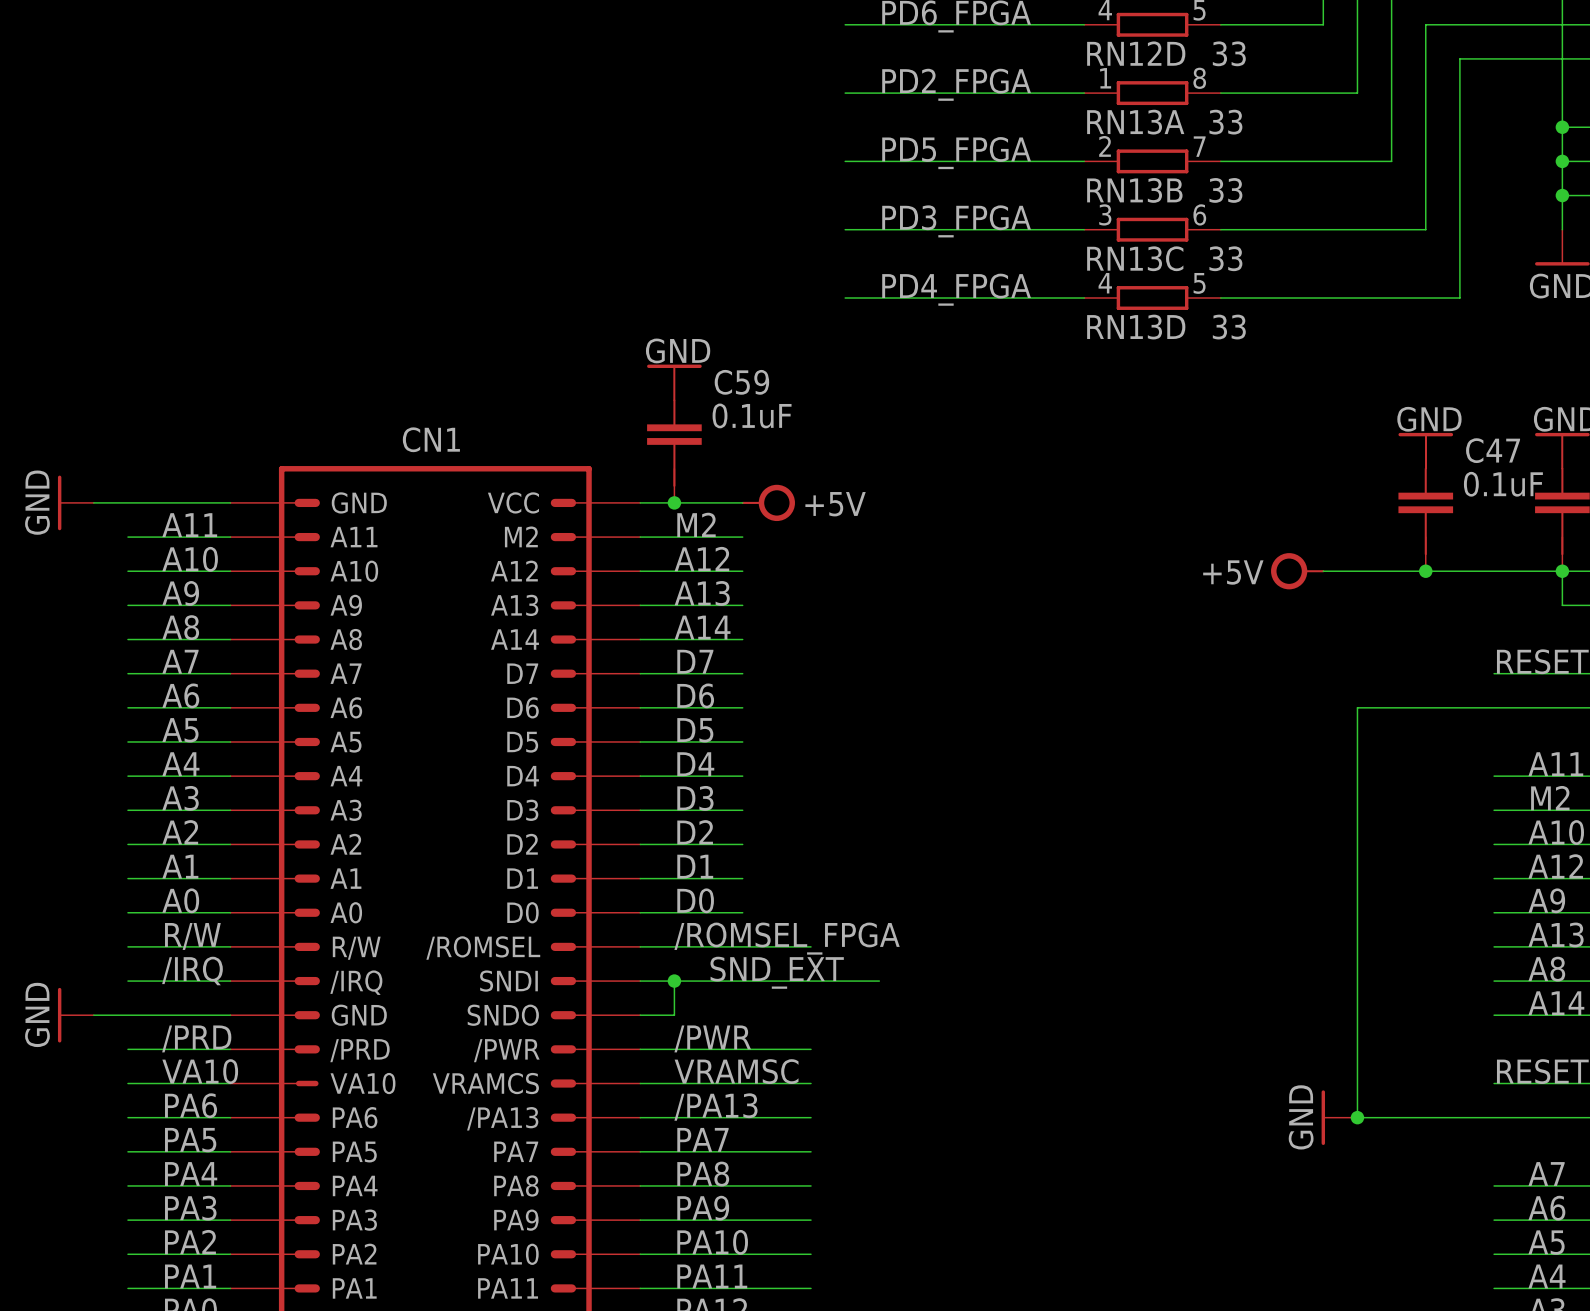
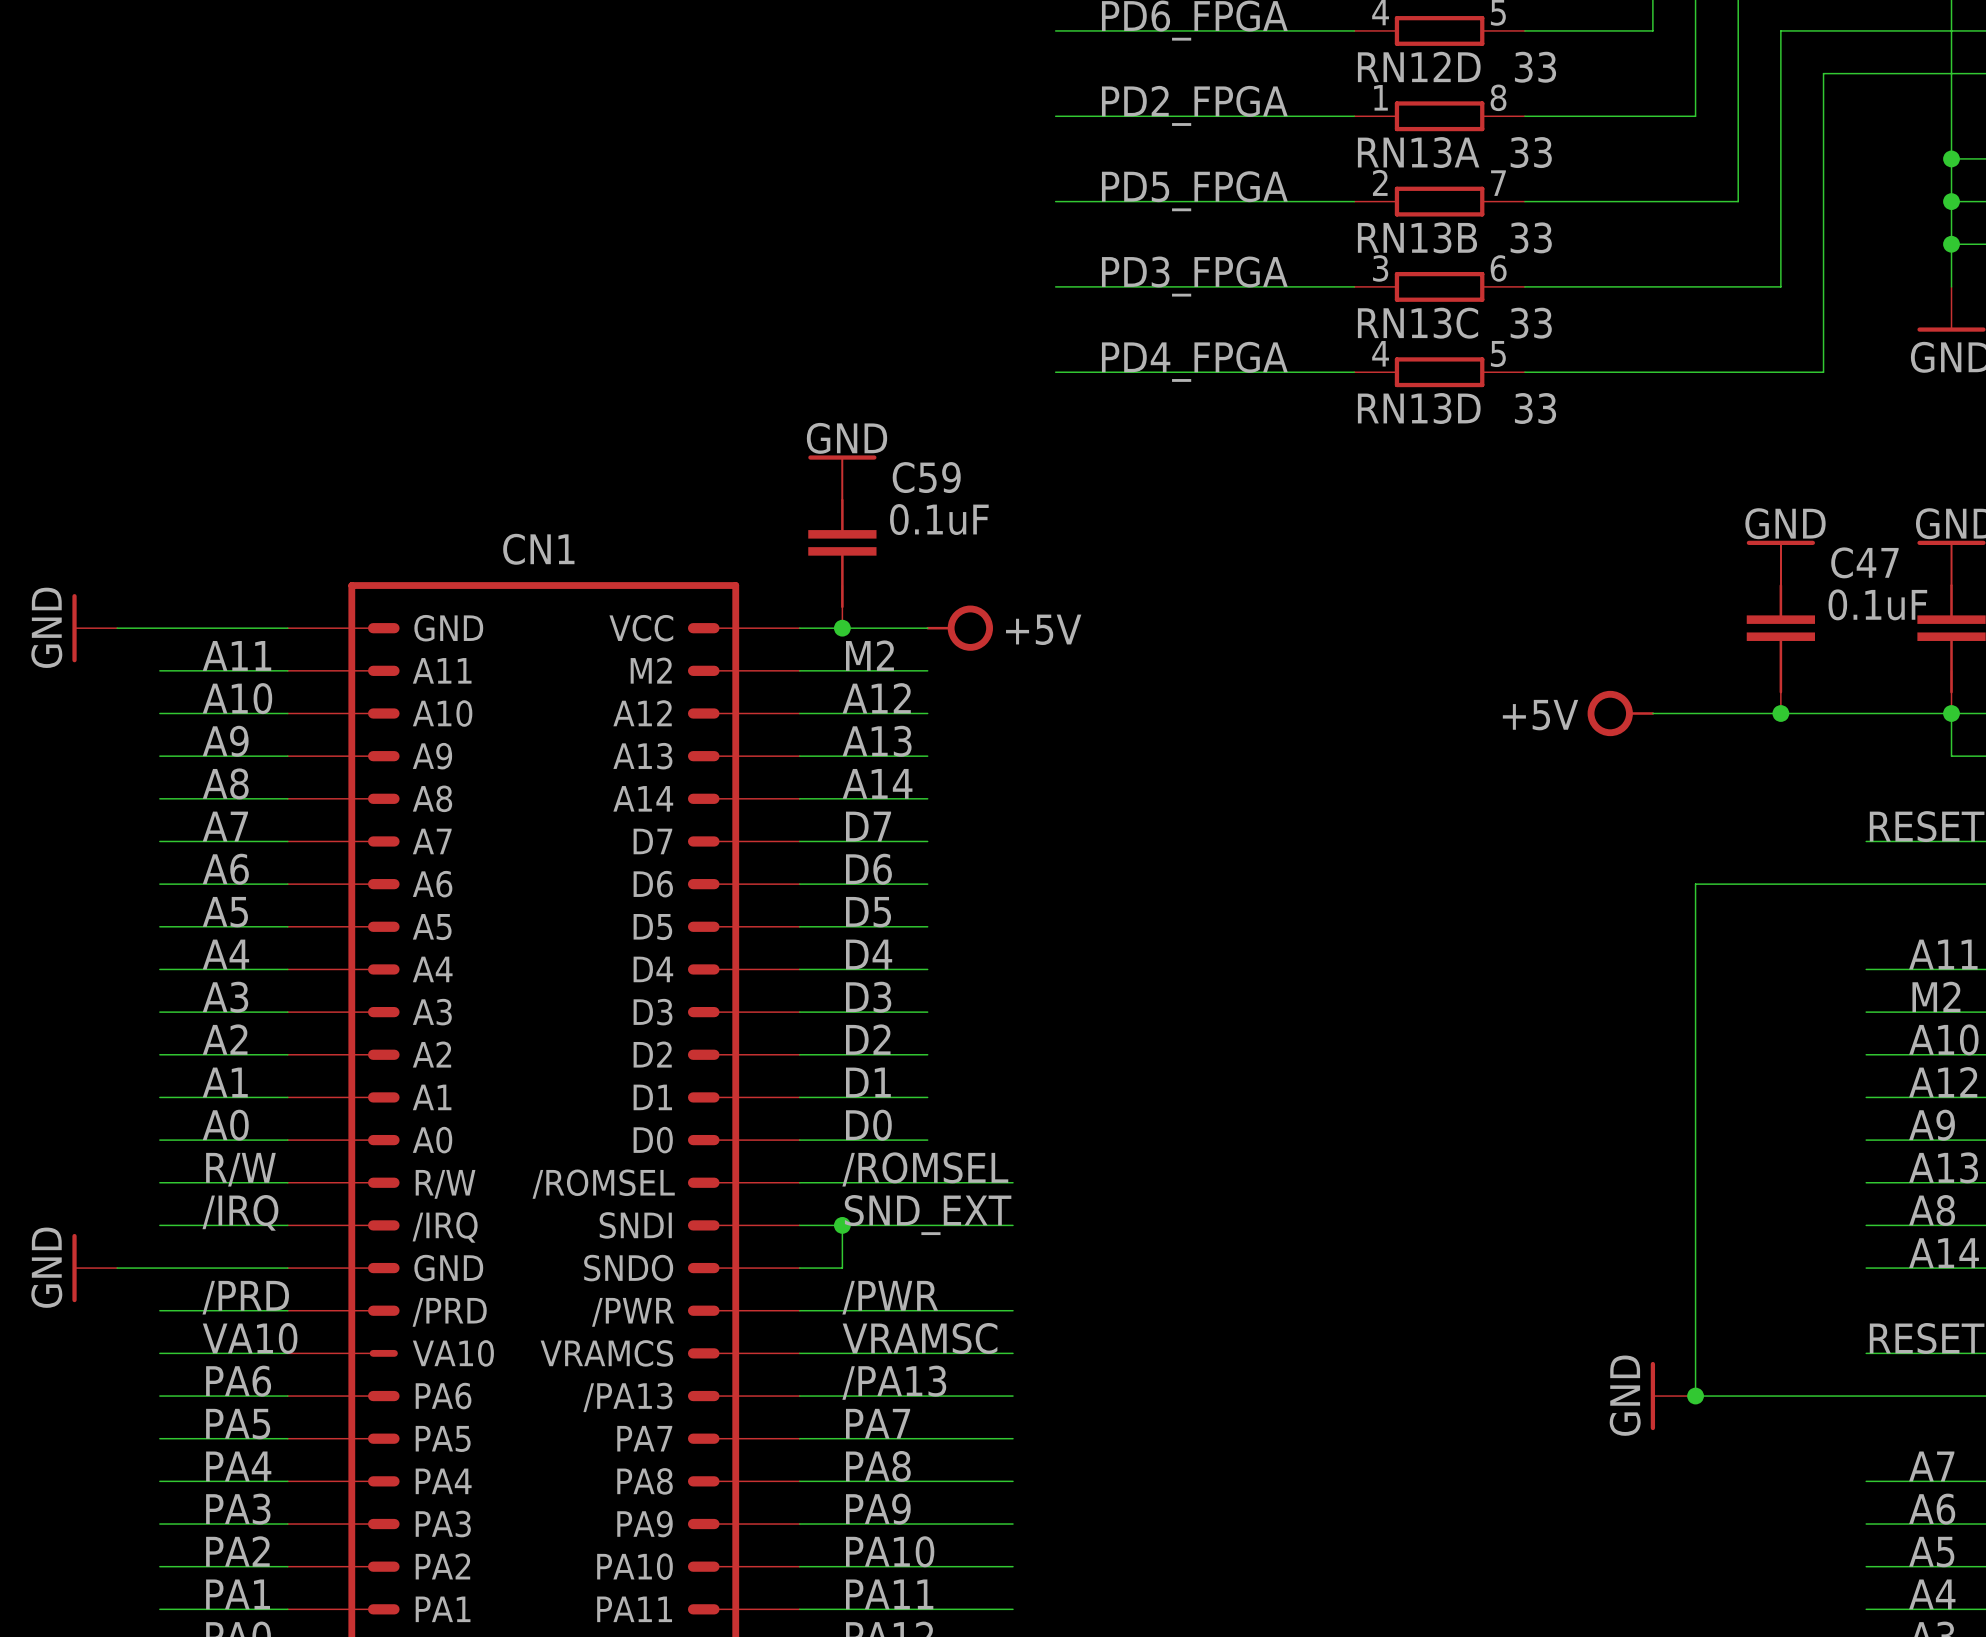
label: /ROMSEL_FPGA (787, 938) -> /ROMSEL (925, 1169)
label position: SND_EXT (777, 972) -> SND_EXT (928, 1215)
wire: (811, 981) (879, 981) -> none

